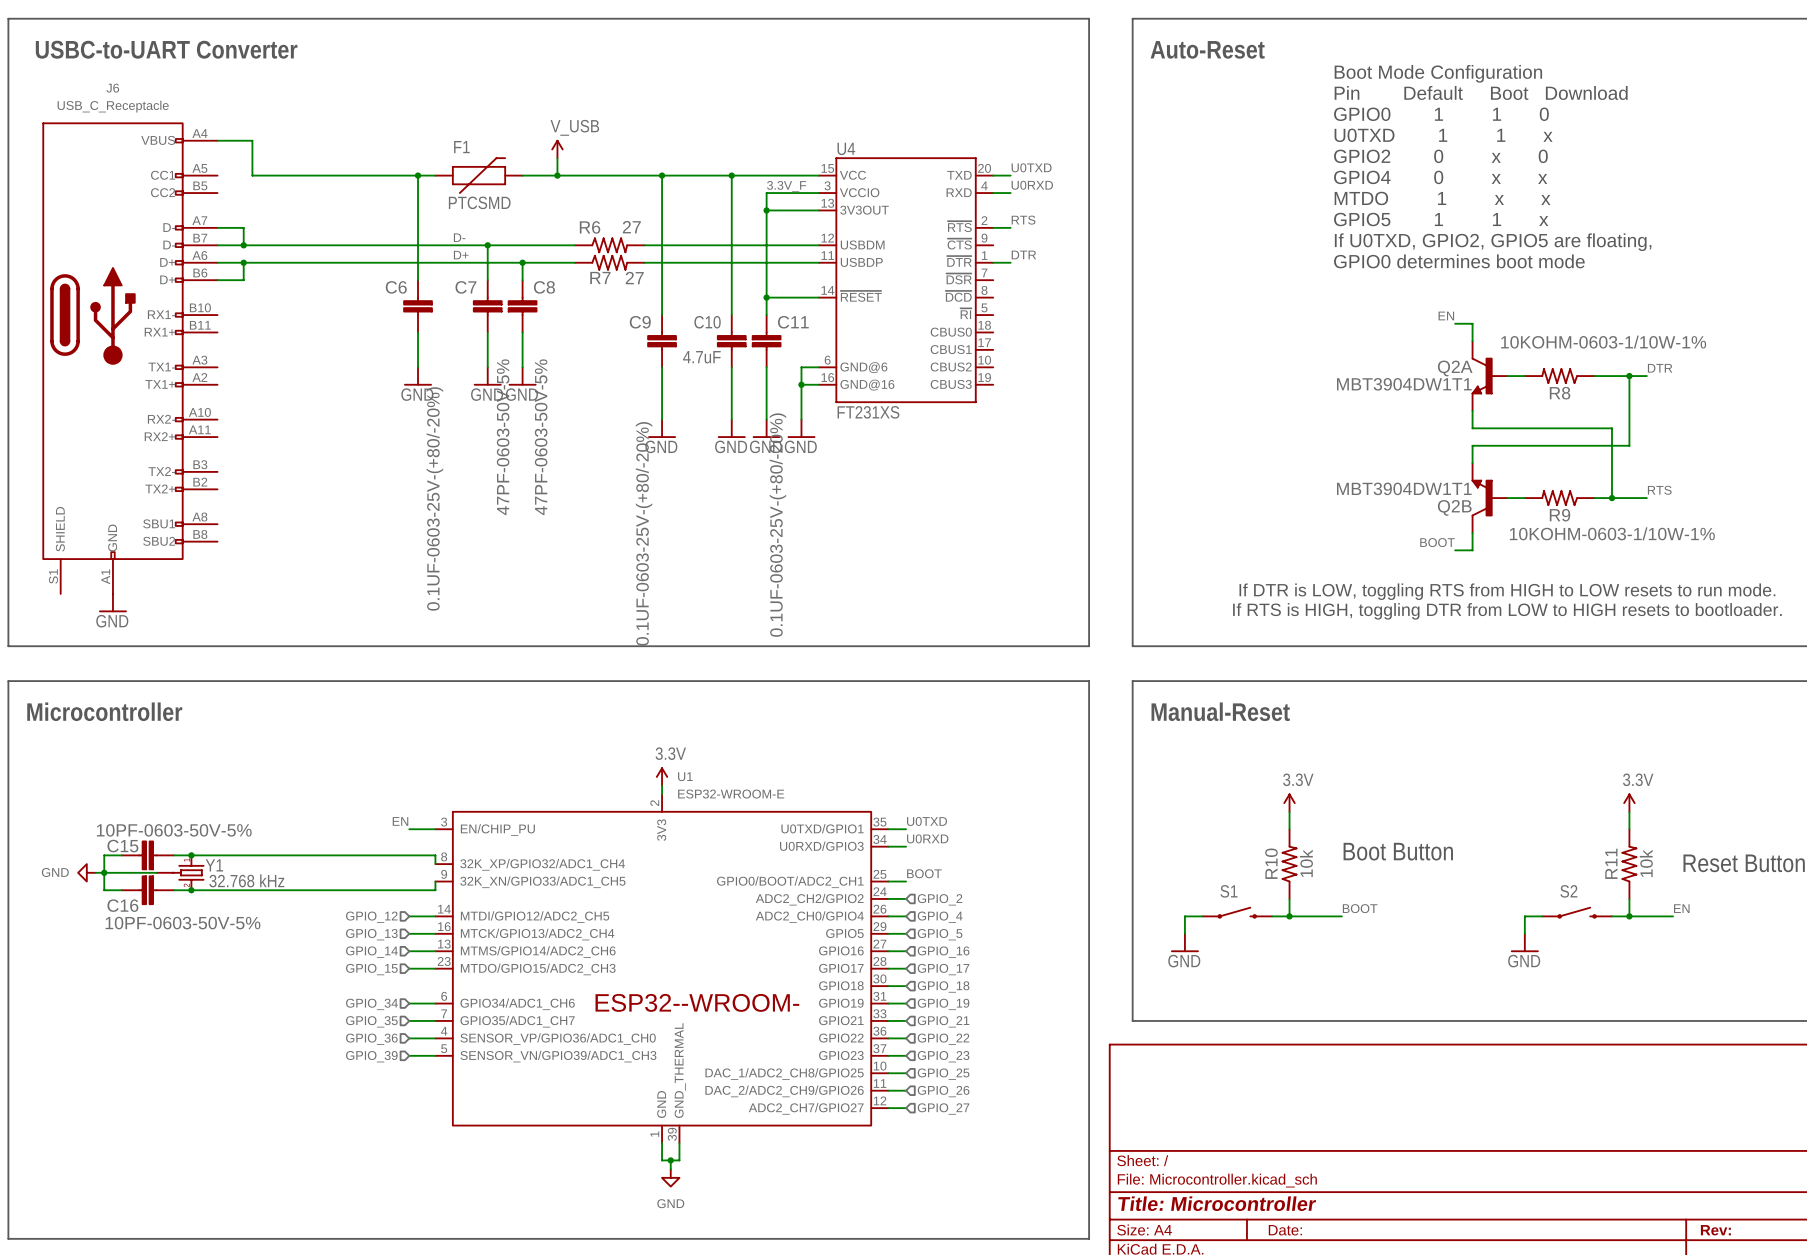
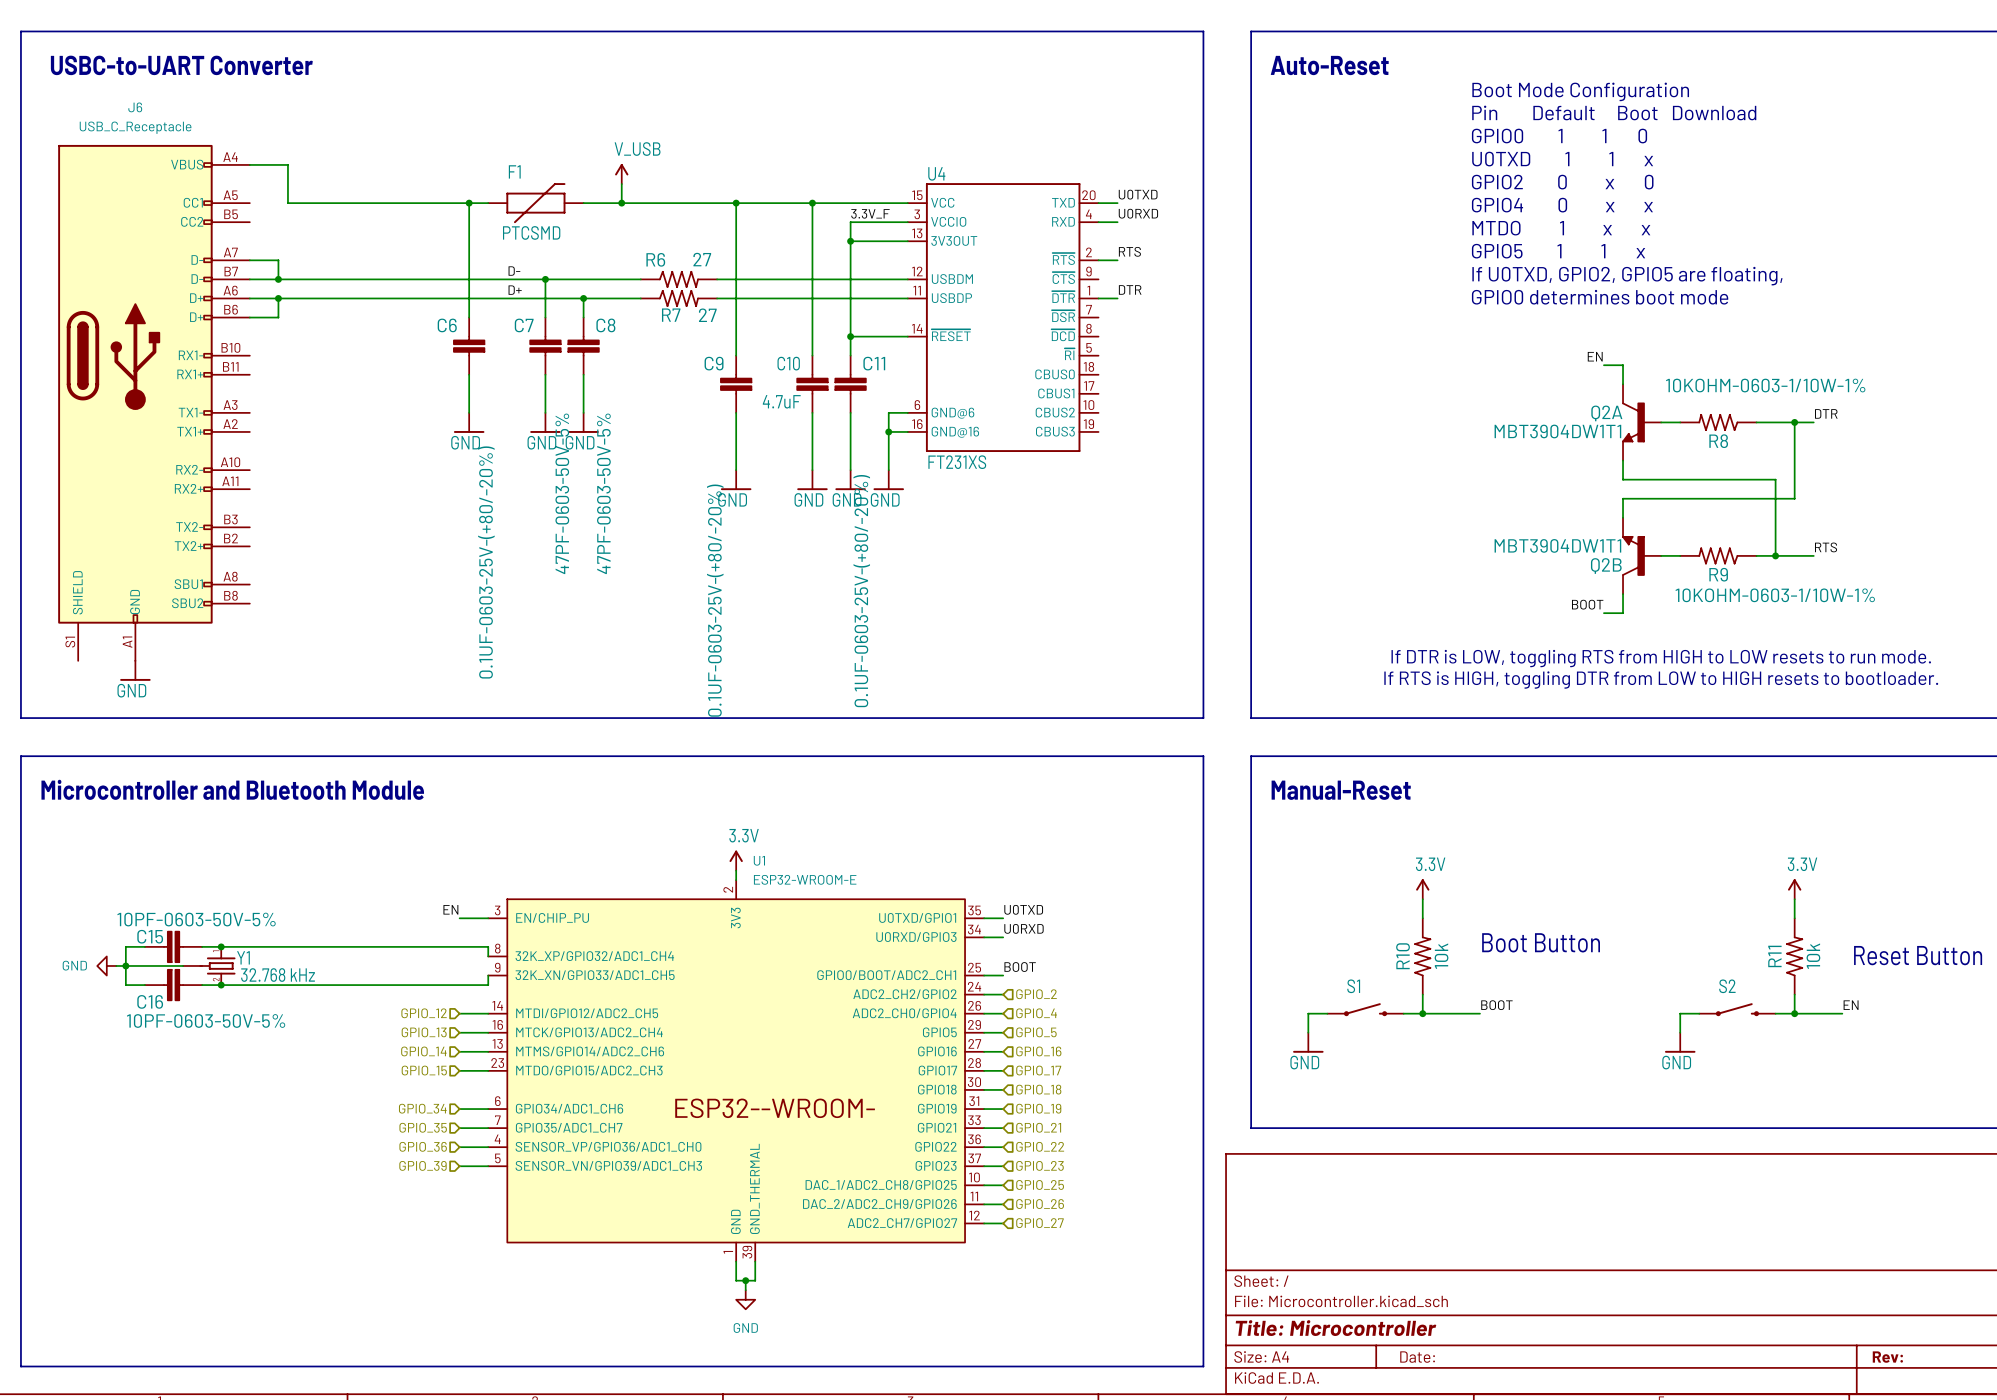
text: Microcontroller (104, 711) -> Microcontroller and Bluetooth Module (232, 789)

